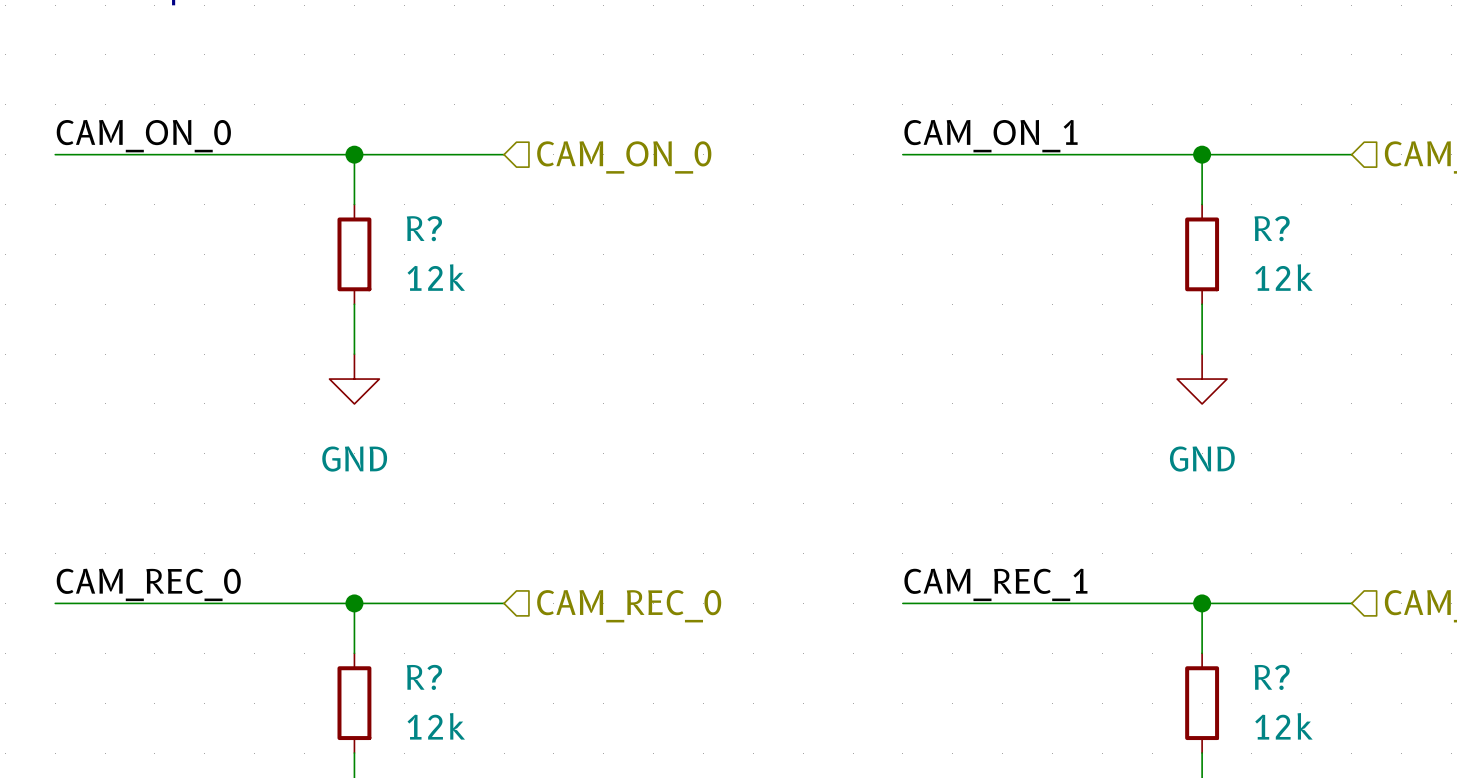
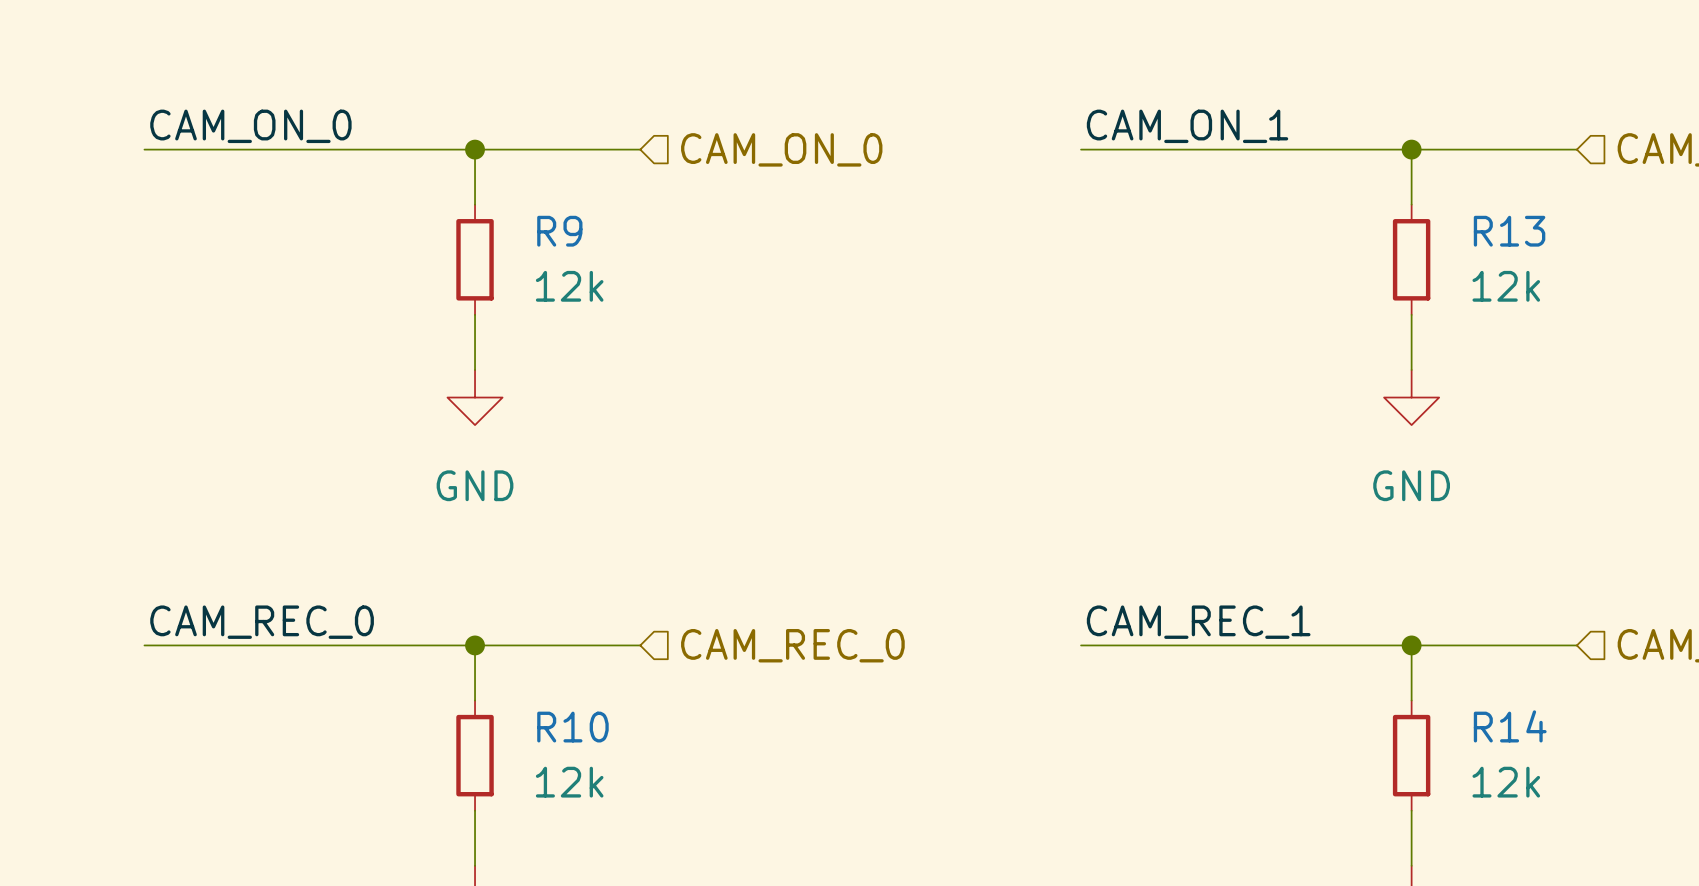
R? name: R? (424, 228) -> R9 (559, 231)
R? name: R? (1272, 228) -> R13 (1509, 231)
R? name: R? (424, 677) -> R10 (572, 727)
R? name: R? (1272, 677) -> R14 (1510, 726)

